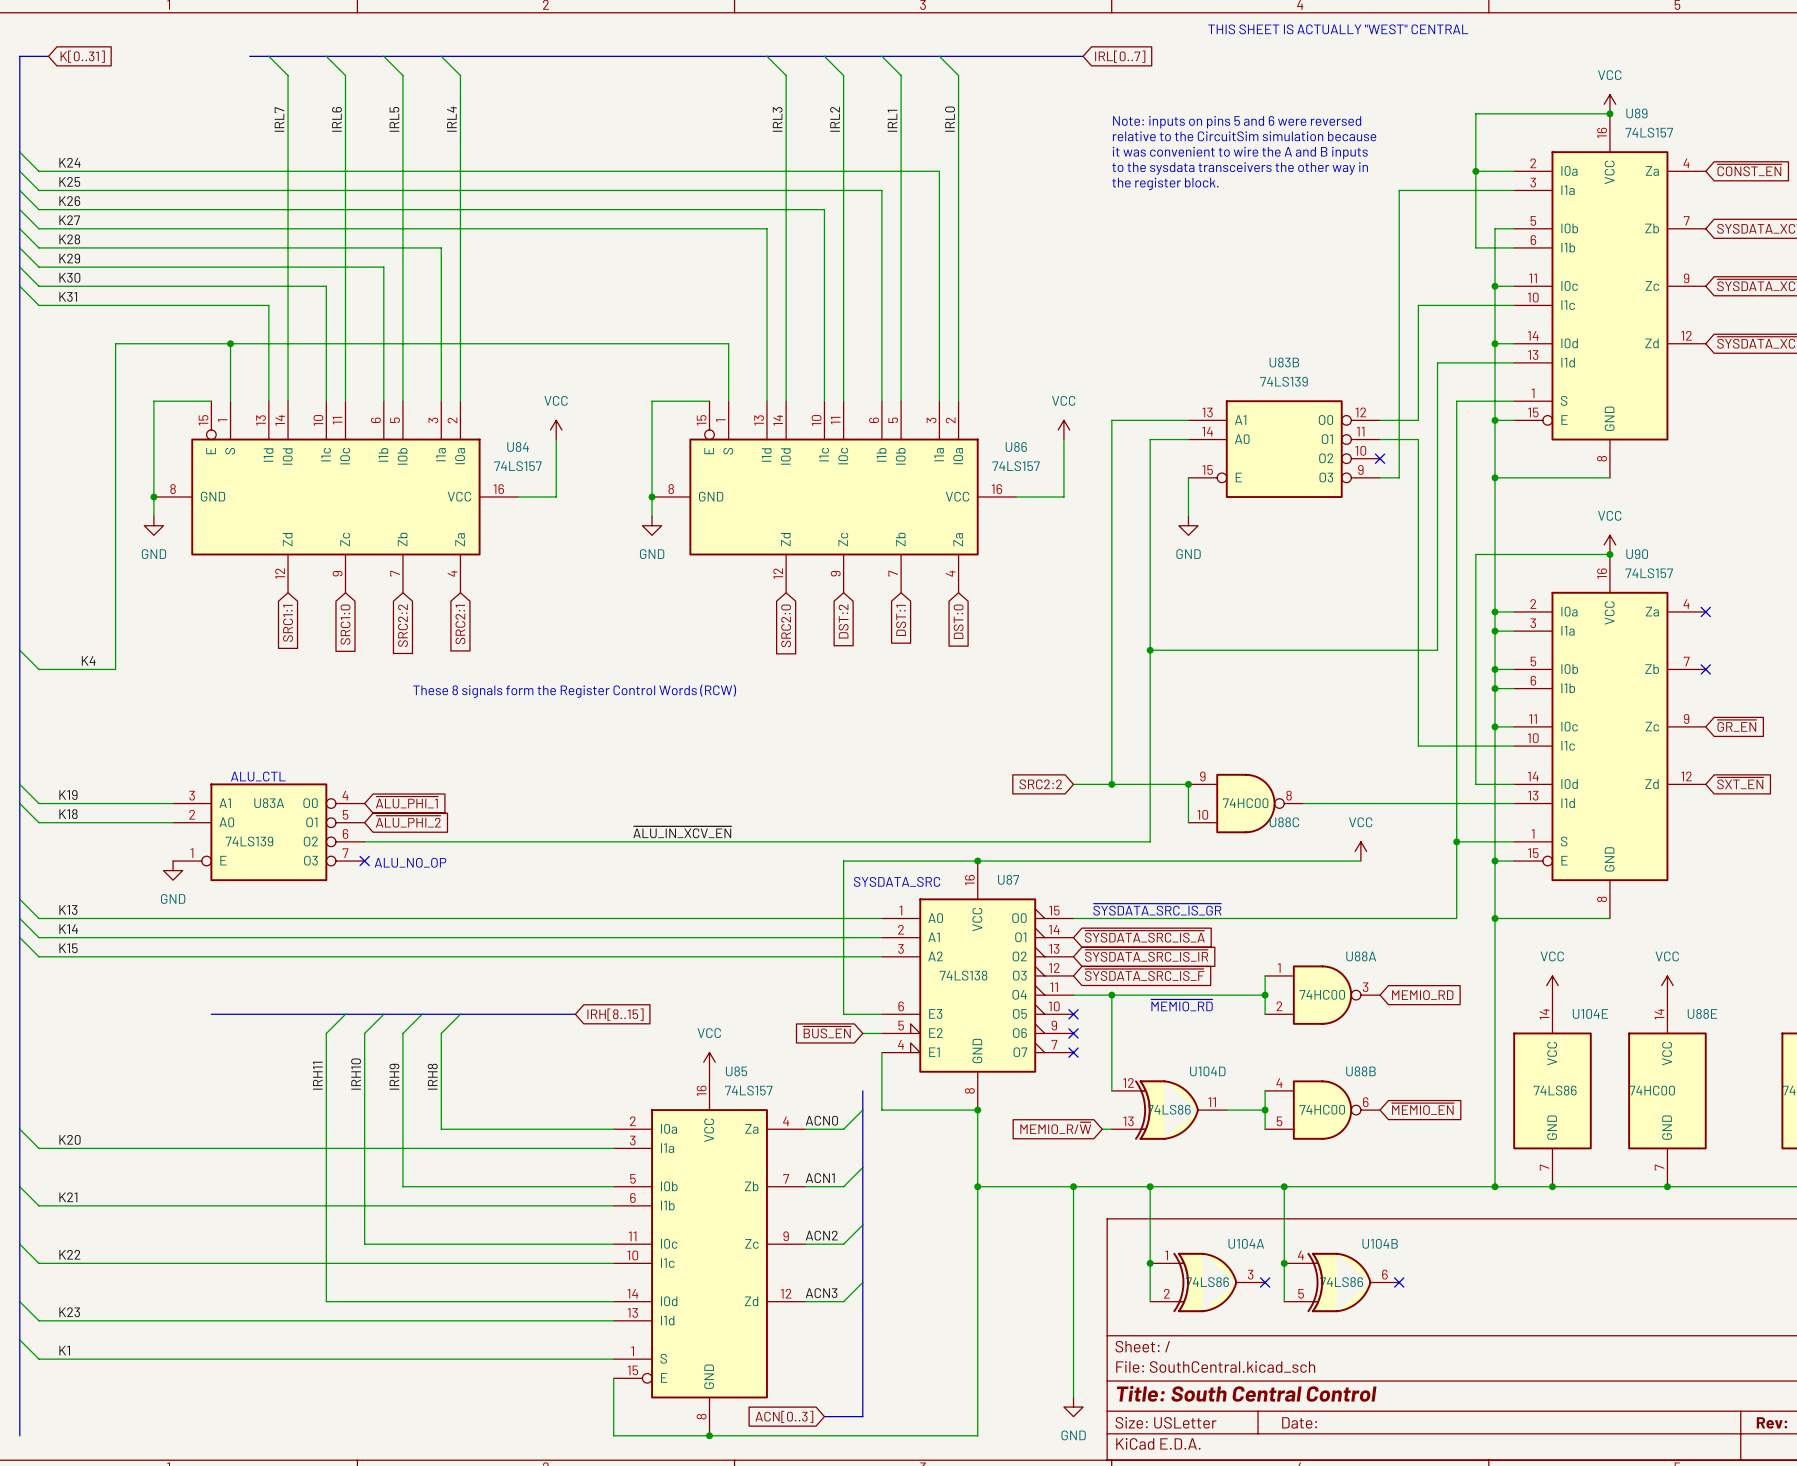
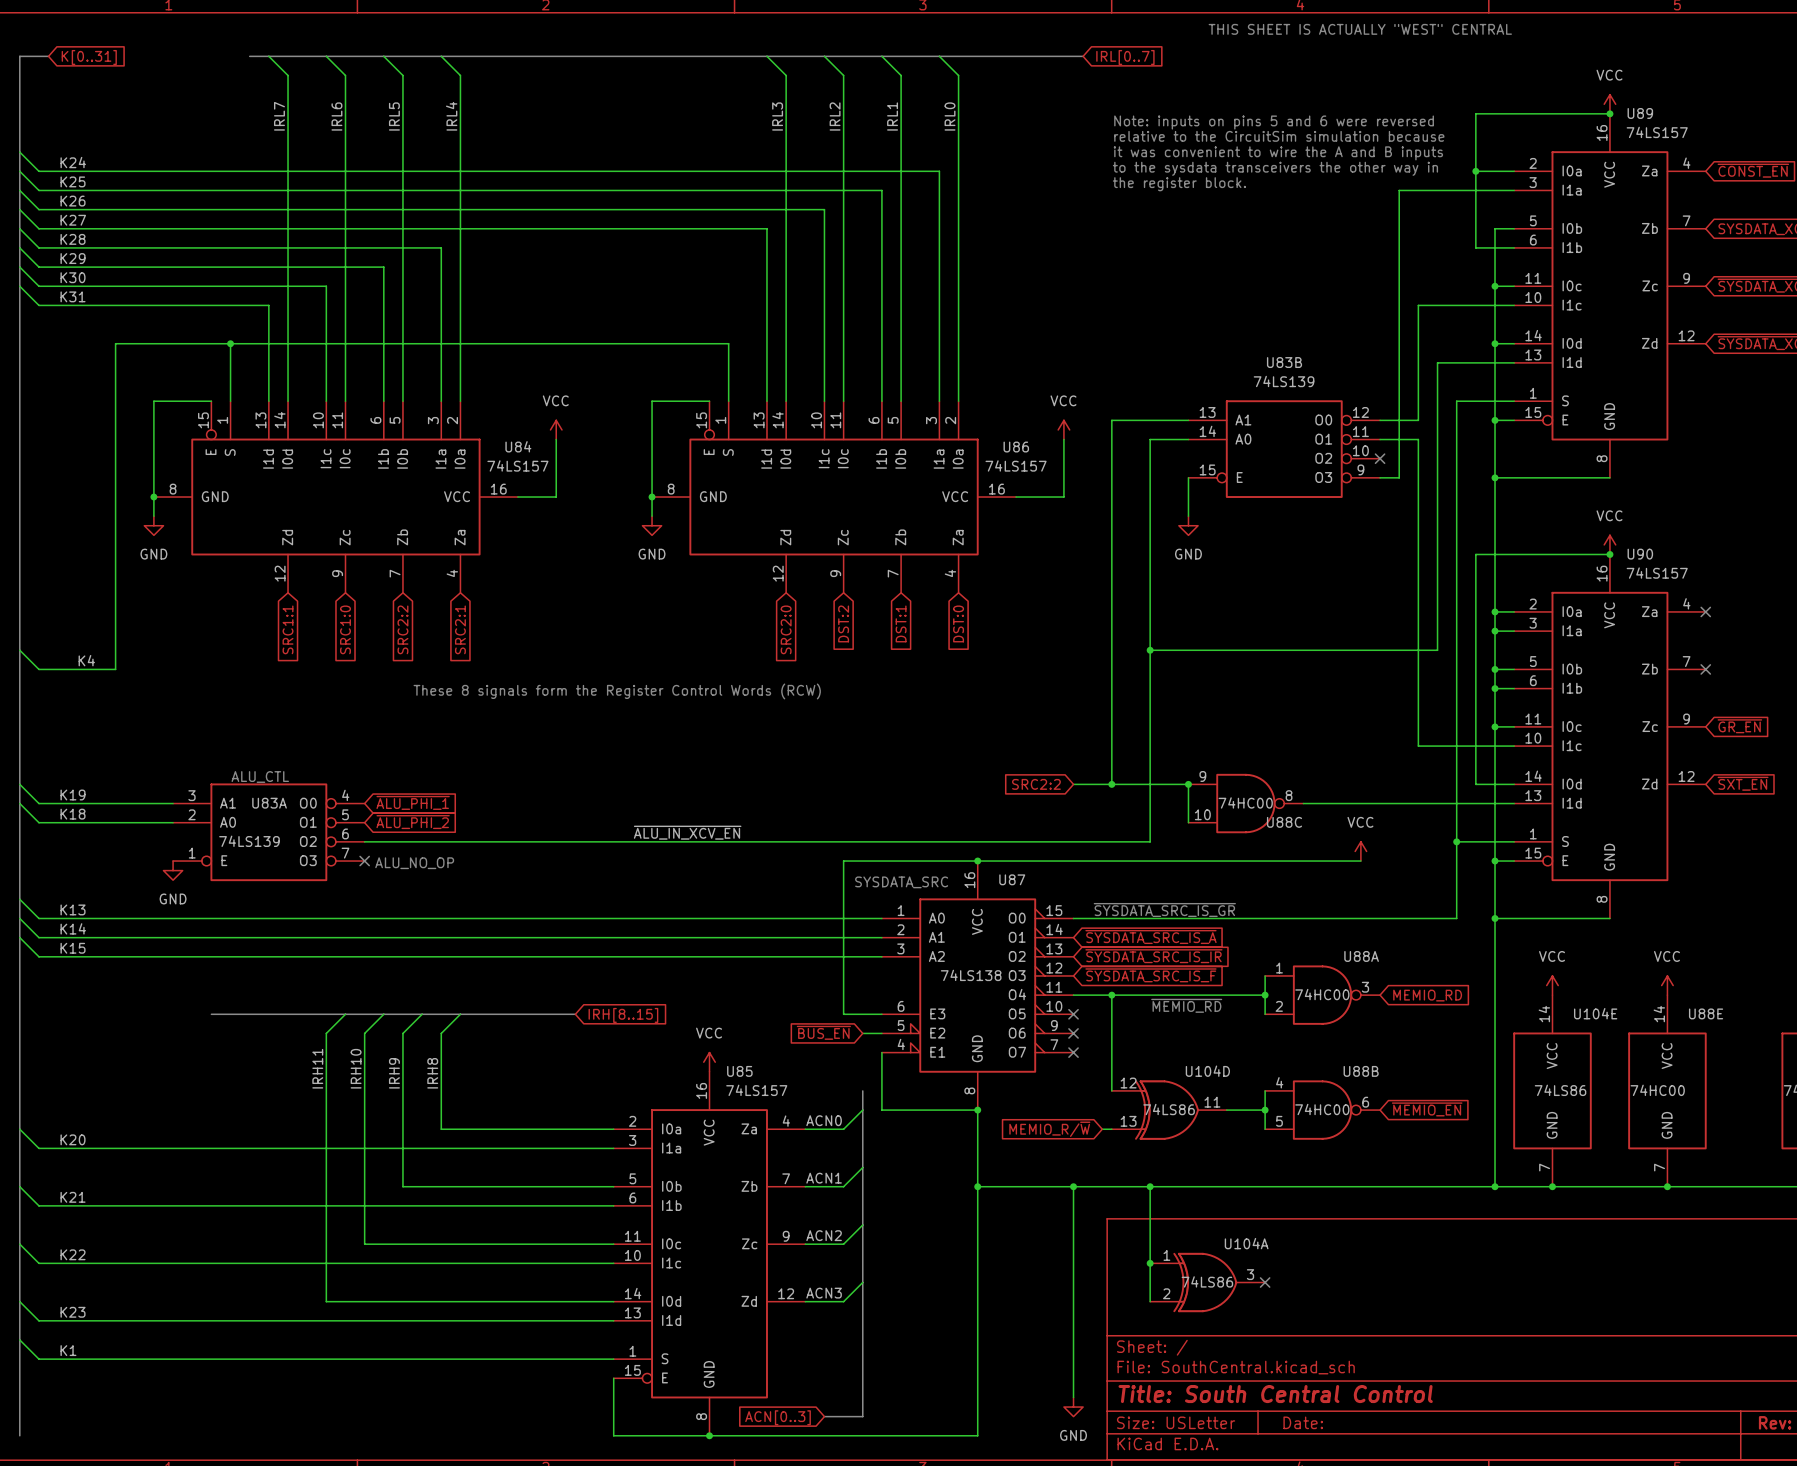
wire: (1284, 1186) (1284, 1301) -> none
junction: (1284, 1186) -> none
junction: (1284, 1263) -> none
U104B: 74LS86 (1341, 1282) -> none
no-connect mark: (1399, 1282) -> none

